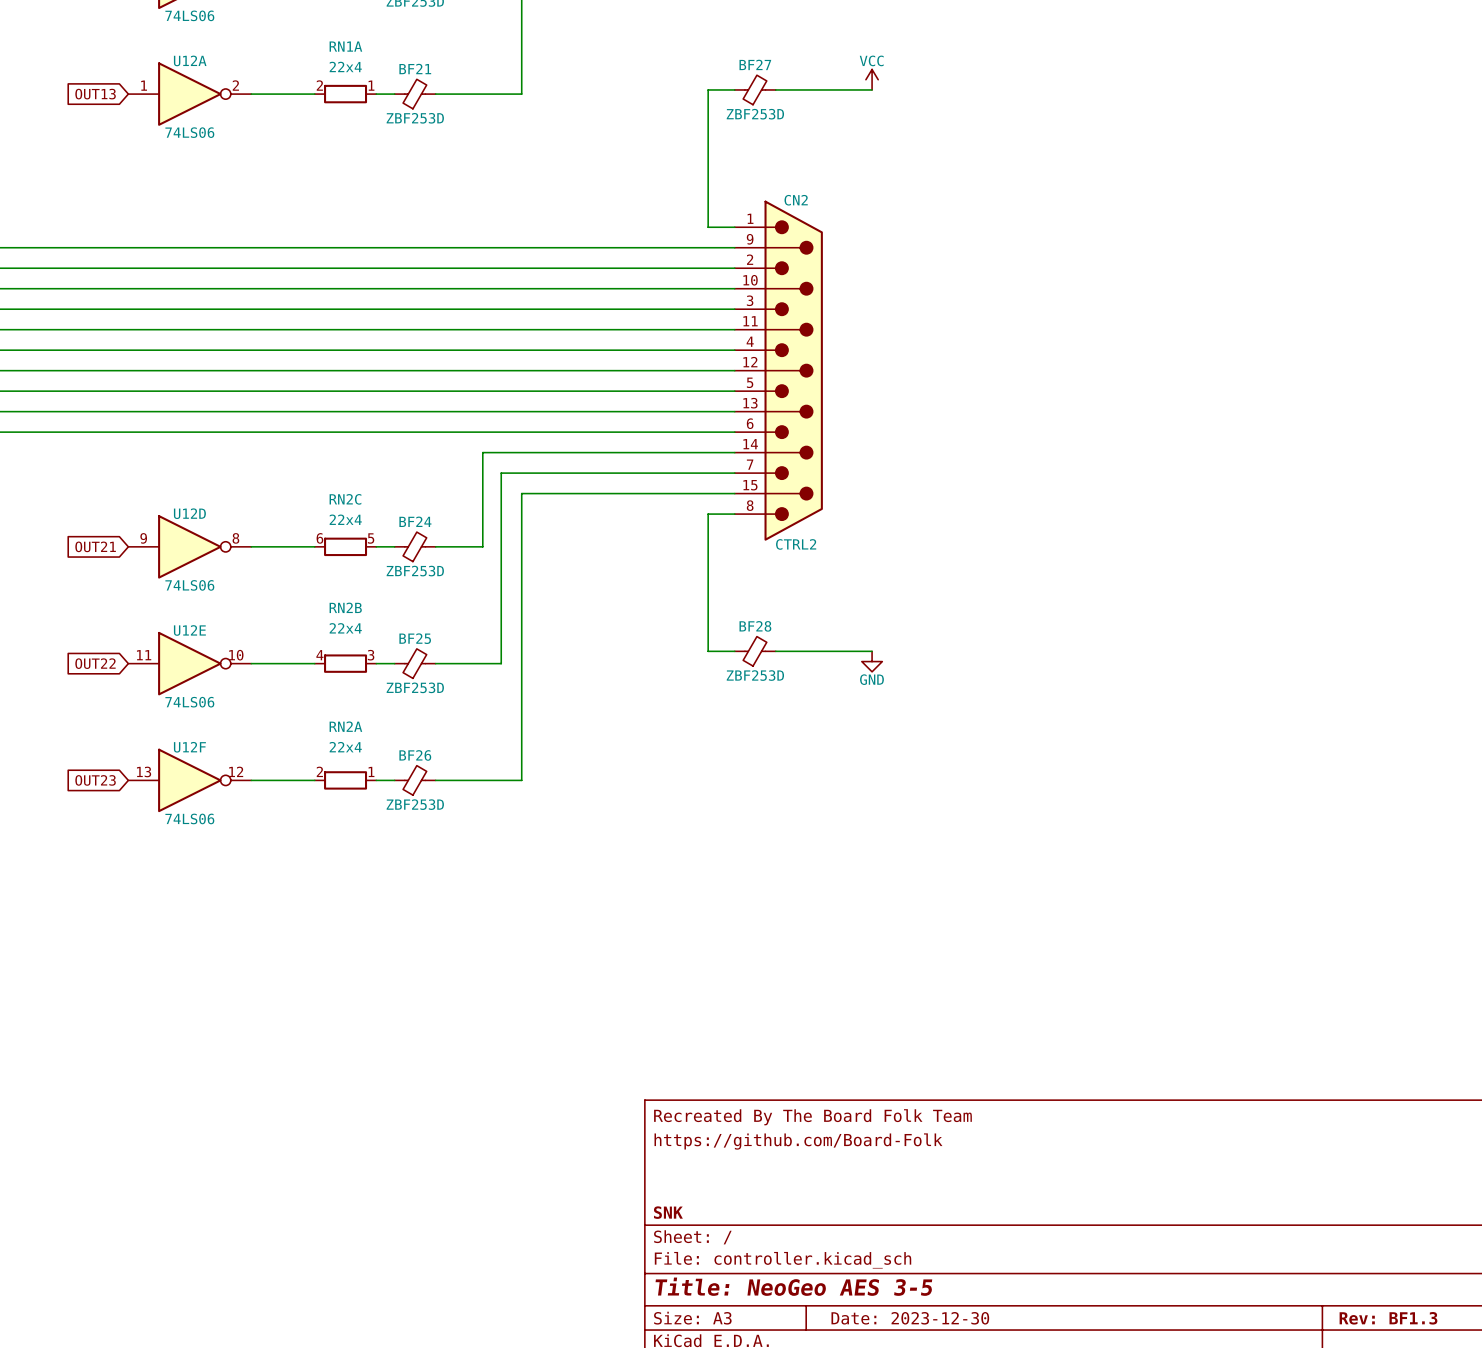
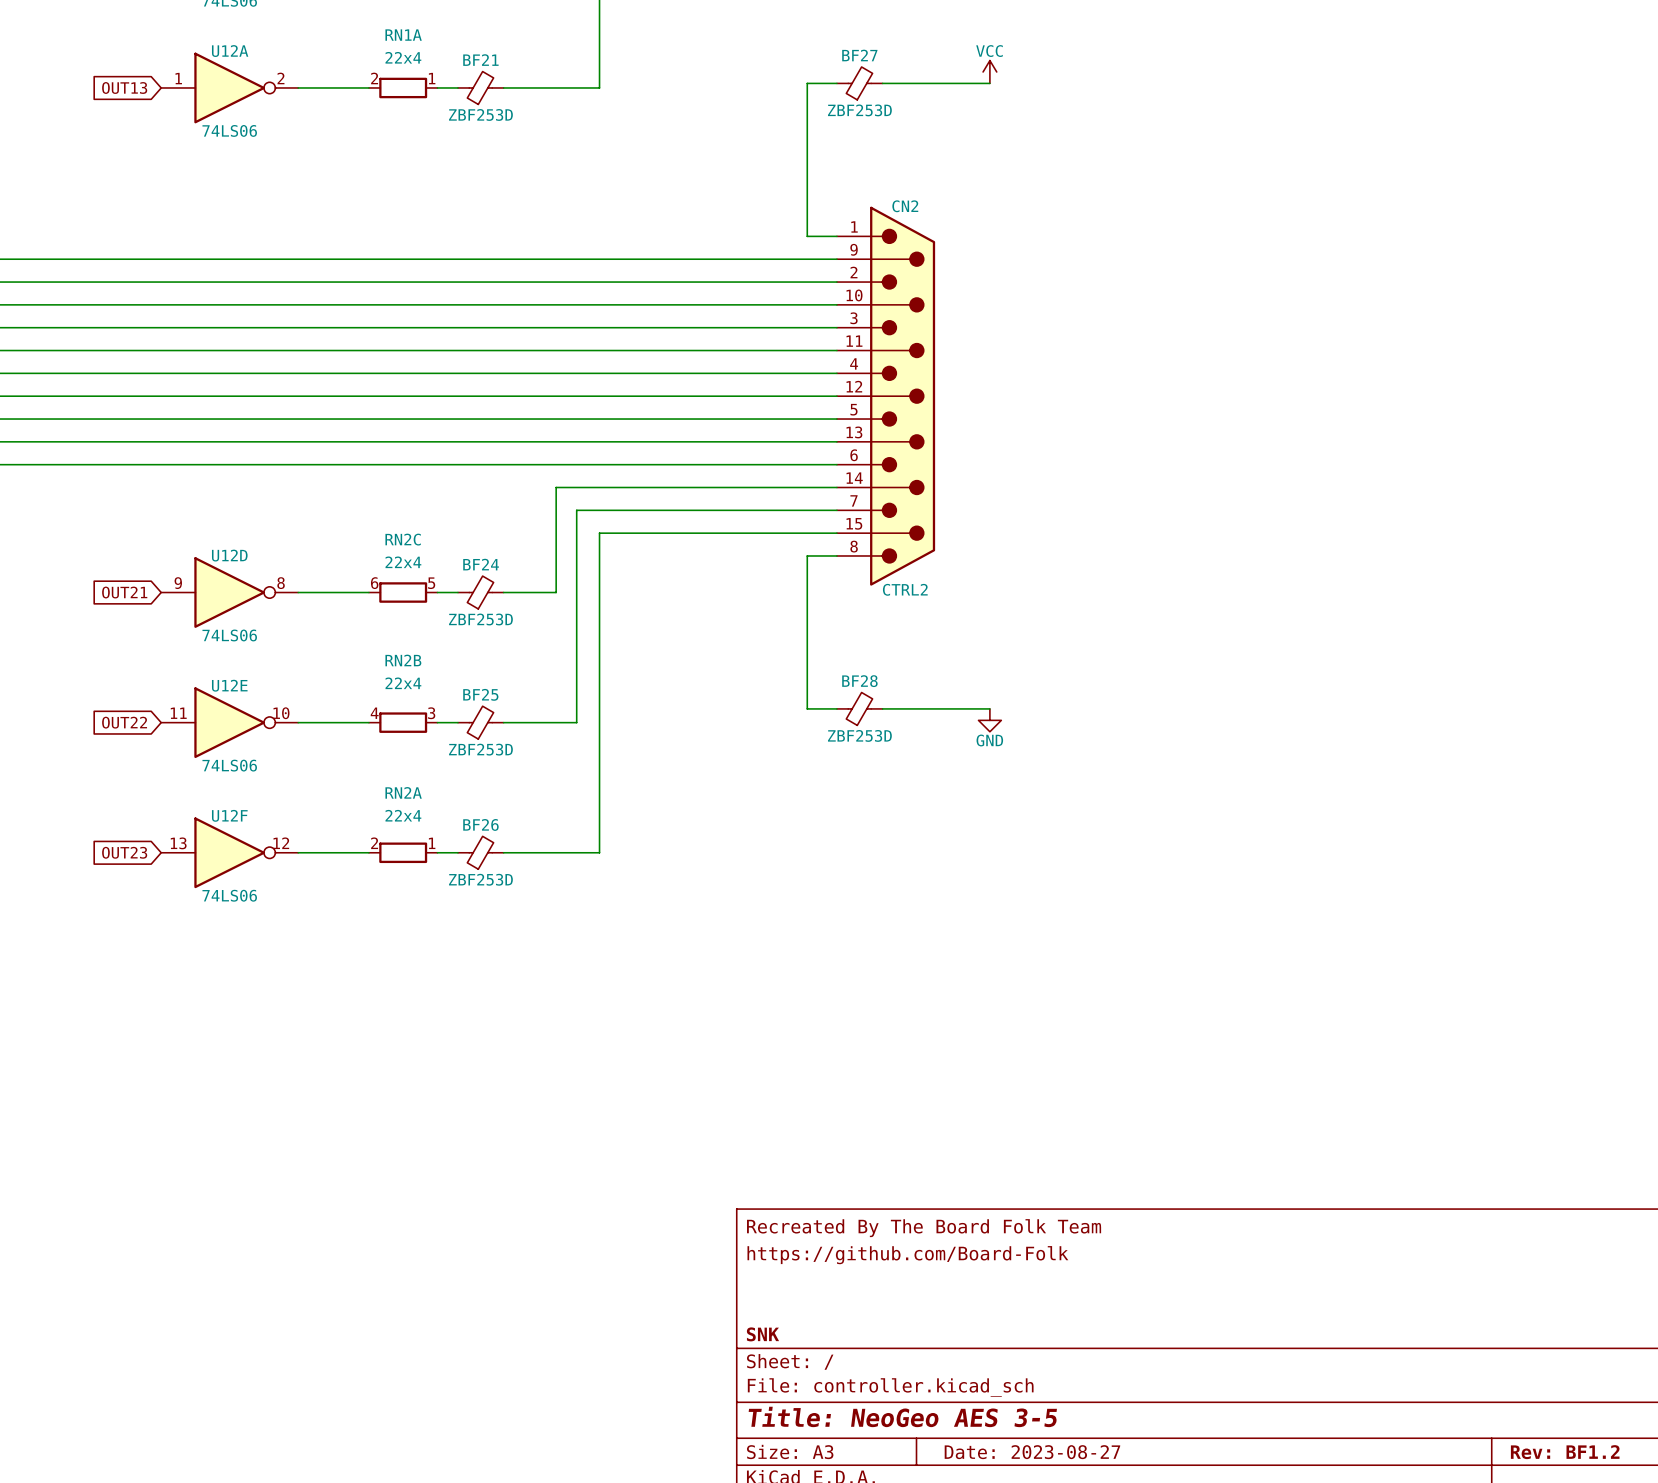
title block: Date: 2023-12-30 (910, 1318) -> Date: 2023-08-27 (1032, 1452)
title block: Rev: BF1.3 (1388, 1318) -> Rev: BF1.2 (1565, 1452)

